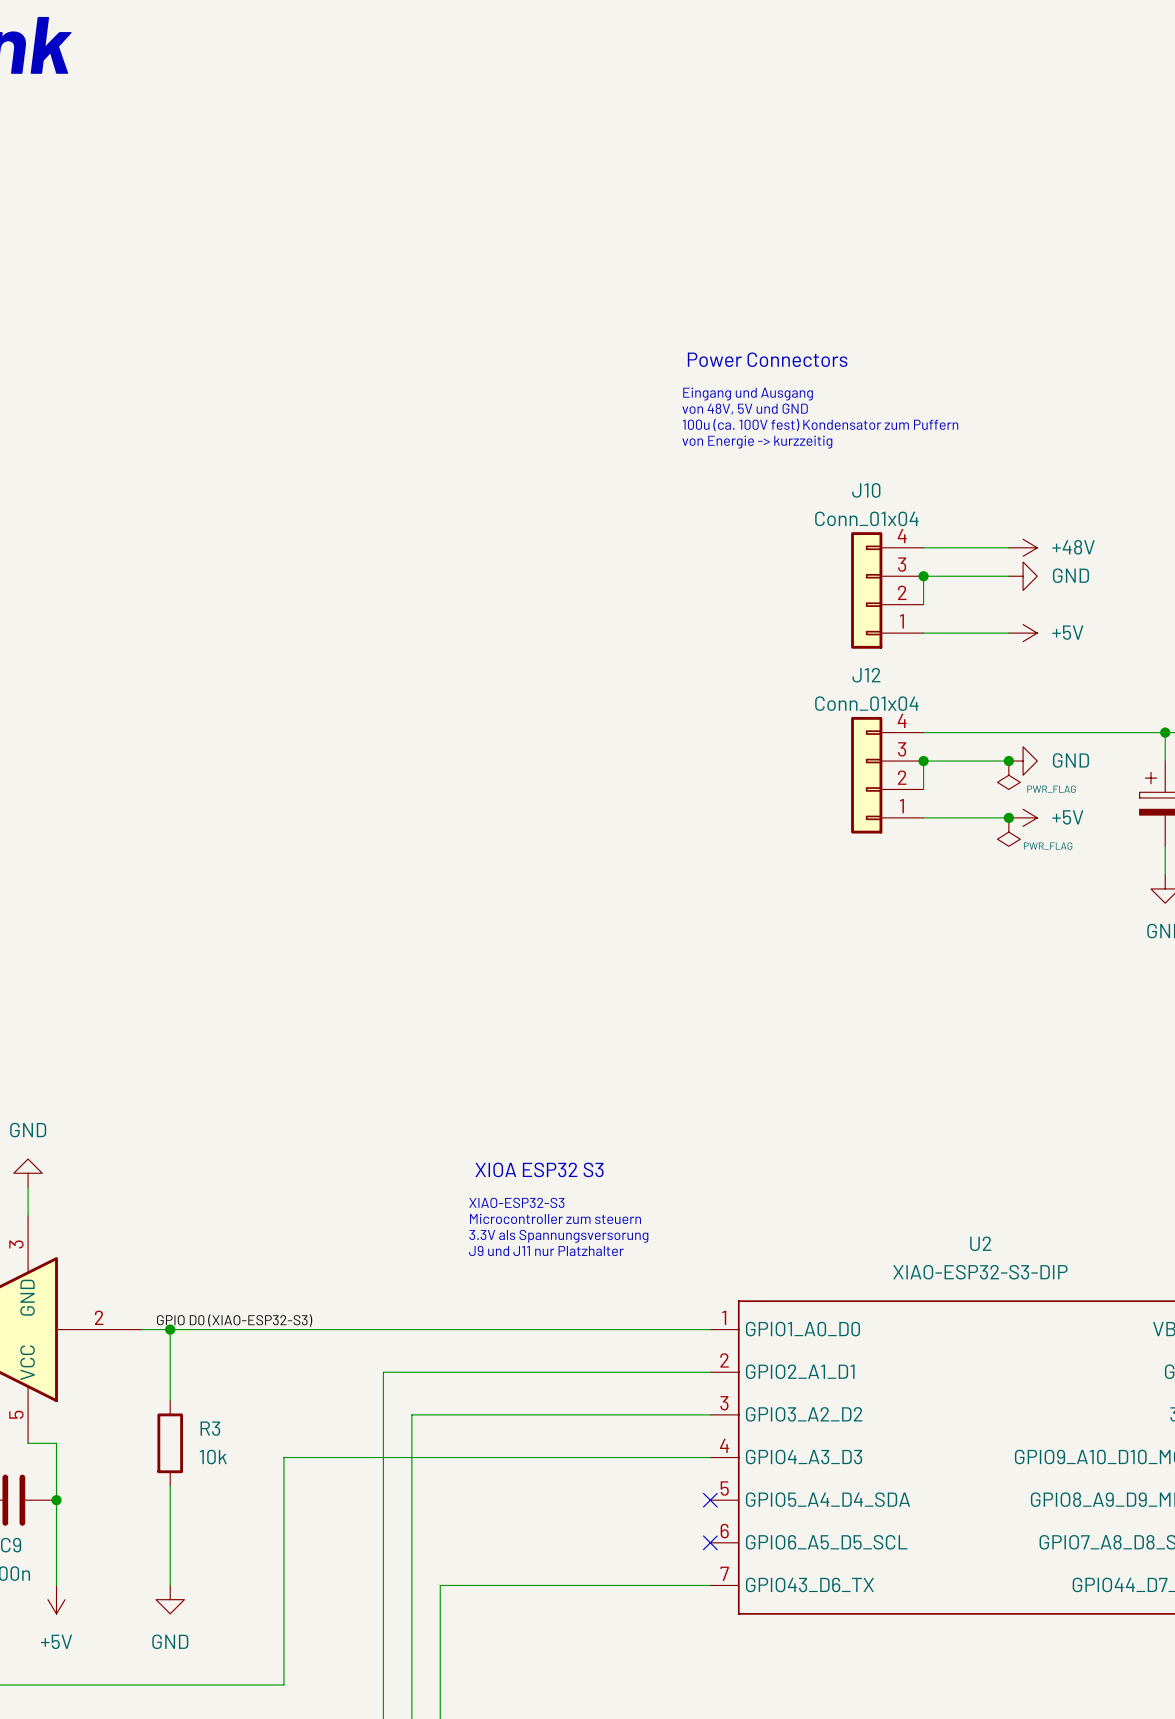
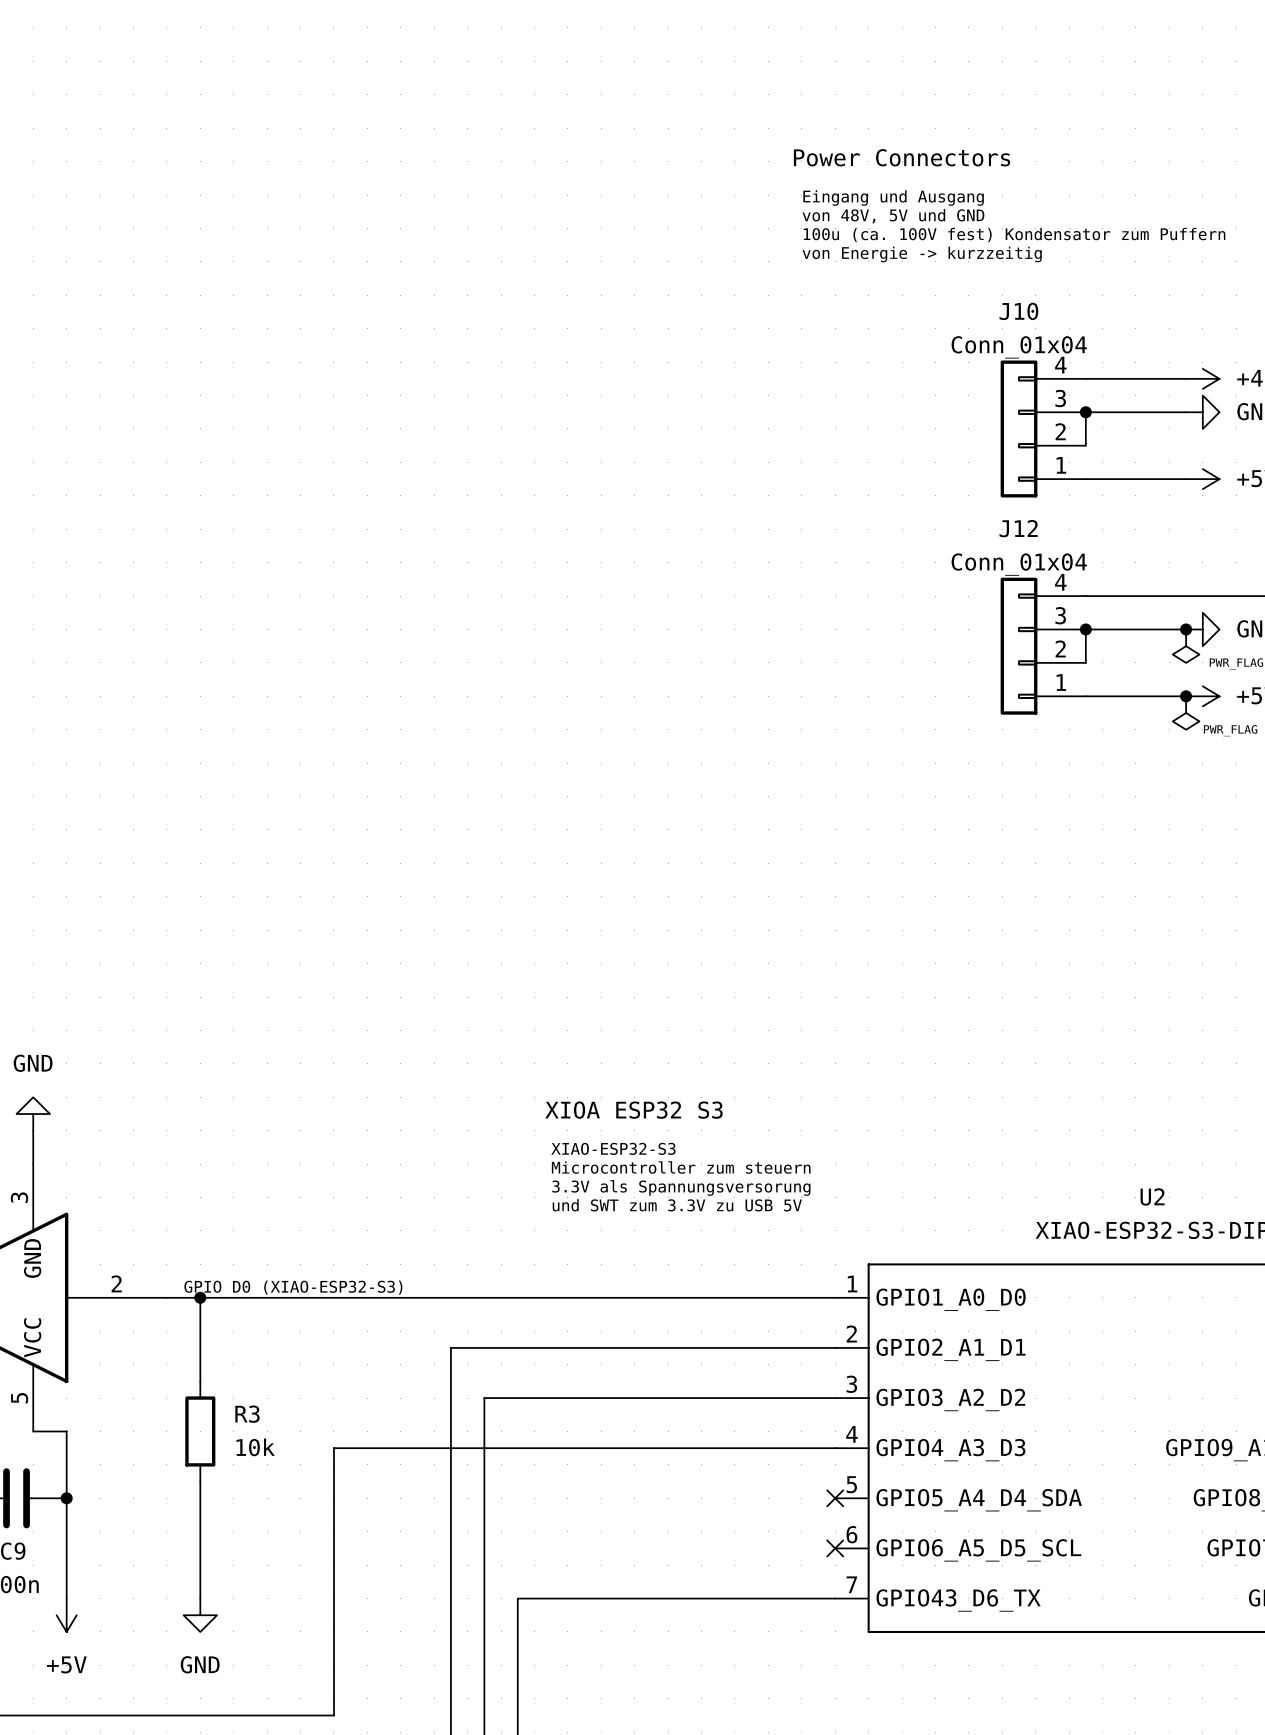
text: J9 und J11 nur Platzhalter (546, 1250) -> und SWT zum 3.3V zu USB 5V (677, 1205)

